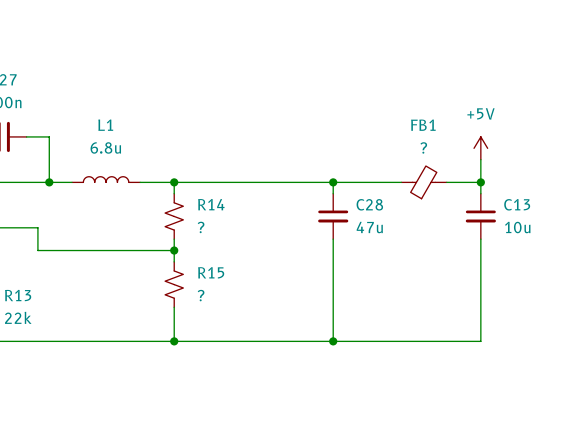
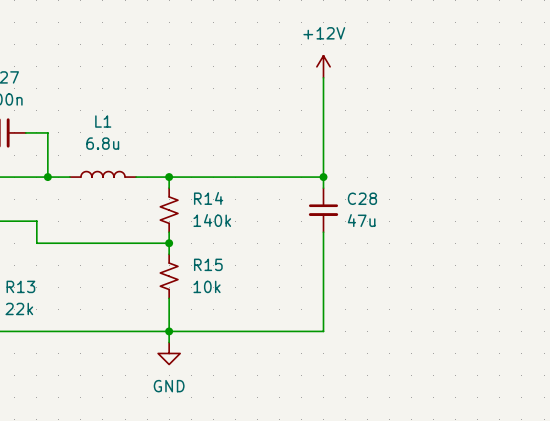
power symbol: none -> +12V (323, 66)
power symbol: +5V (480, 148) -> none
wire: (480, 159) (480, 193) -> none
wire: (333, 182) (401, 182) -> (323, 177) (323, 77)
FB1: ? (424, 182) -> none
wire: (446, 182) (480, 182) -> none
junction: (480, 182) -> none
C13: 10u (480, 216) -> none
R14 value: ? (201, 227) -> 140k (212, 220)
wire: (480, 239) (480, 341) (333, 341) -> none
R15 value: ? (201, 295) -> 10k (207, 286)
wire: none -> (169, 331) (169, 342)
junction: (333, 341) -> none
power symbol: none -> GND (169, 353)

